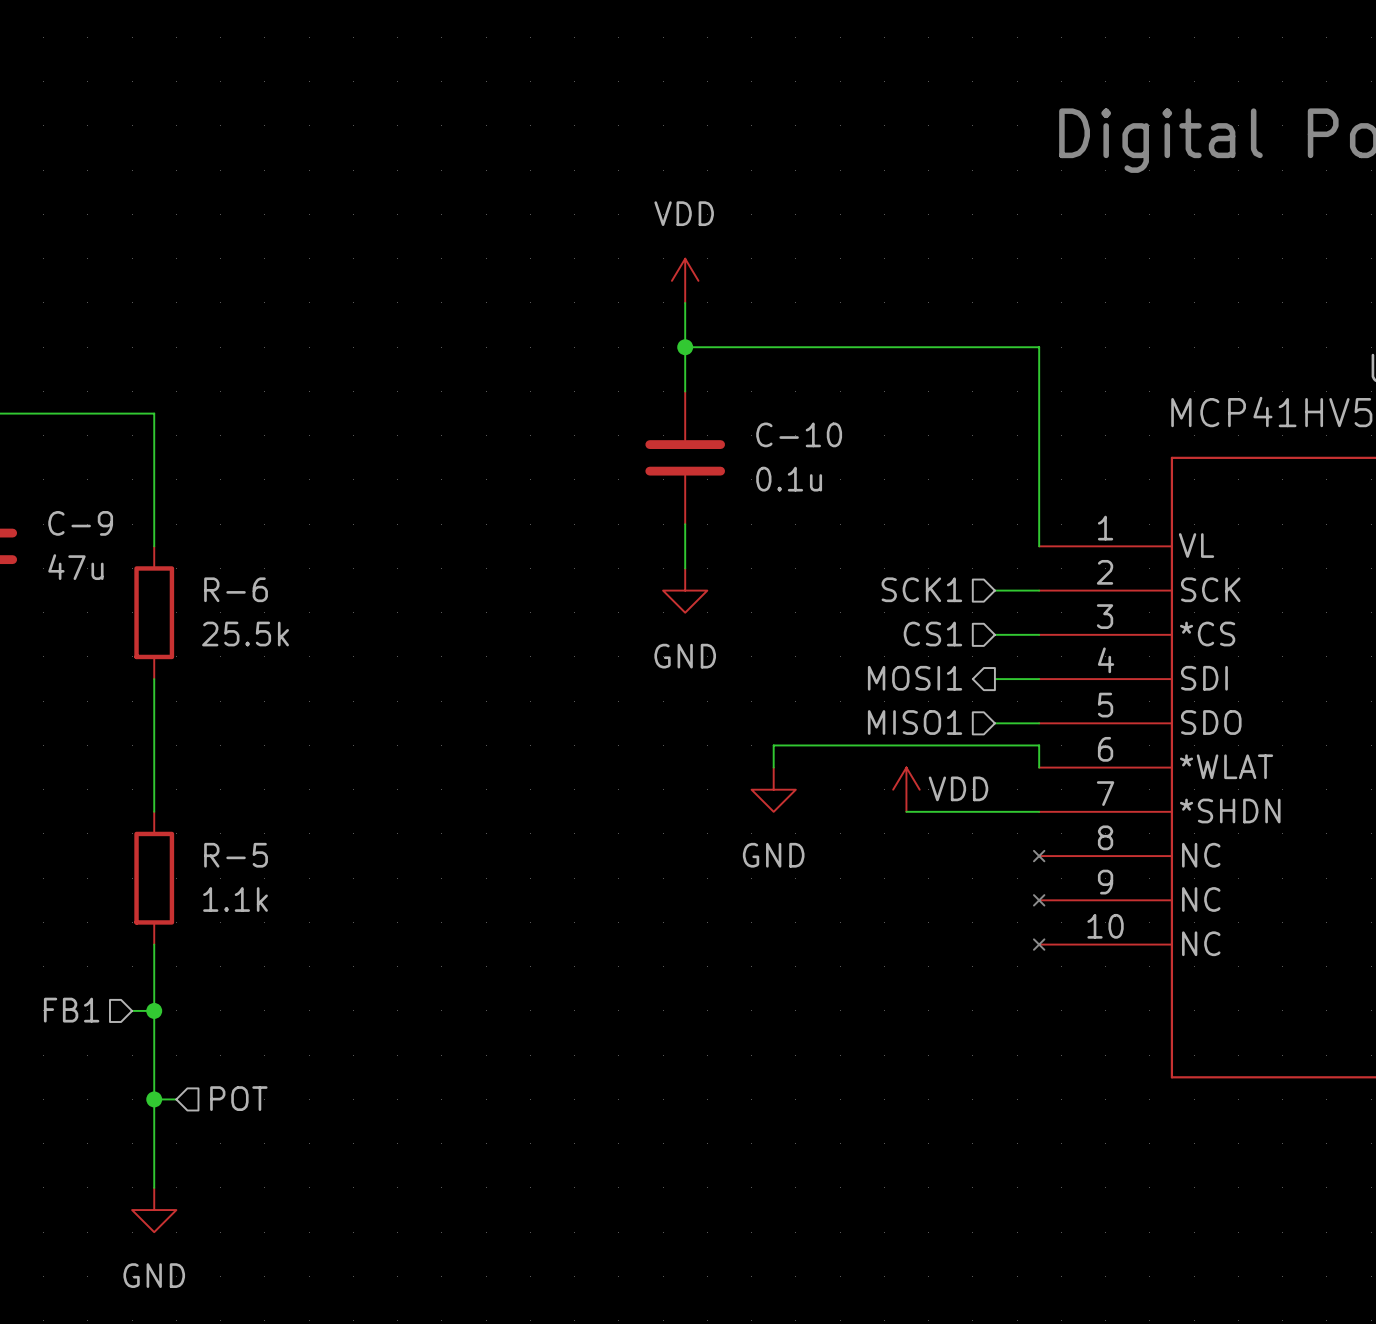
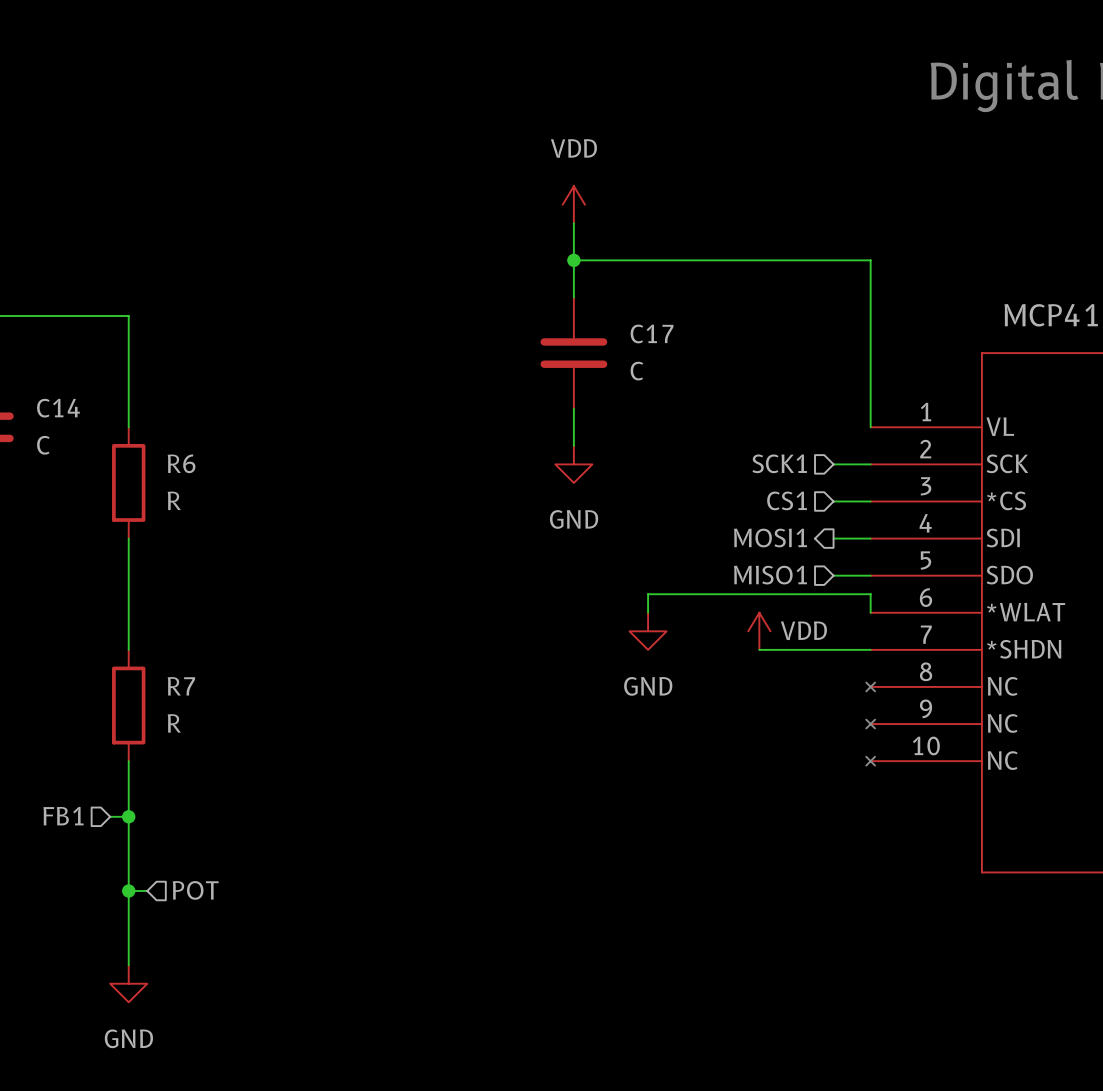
C-10 name: C-10 (799, 434) -> C17 (652, 333)
C-10 value: 0.1u (789, 479) -> C (636, 371)
C-9 name: C-9 (80, 523) -> C14 (58, 408)
C-9 value: 47u (75, 567) -> C (43, 445)
R-6 name: R-6 (236, 589) -> R6 (181, 463)
R-6 value: 25.5k (245, 634) -> R (174, 500)
R-5 name: R-5 (236, 855) -> R7 (181, 686)
R-5 value: 1.1k (235, 899) -> R (174, 723)

